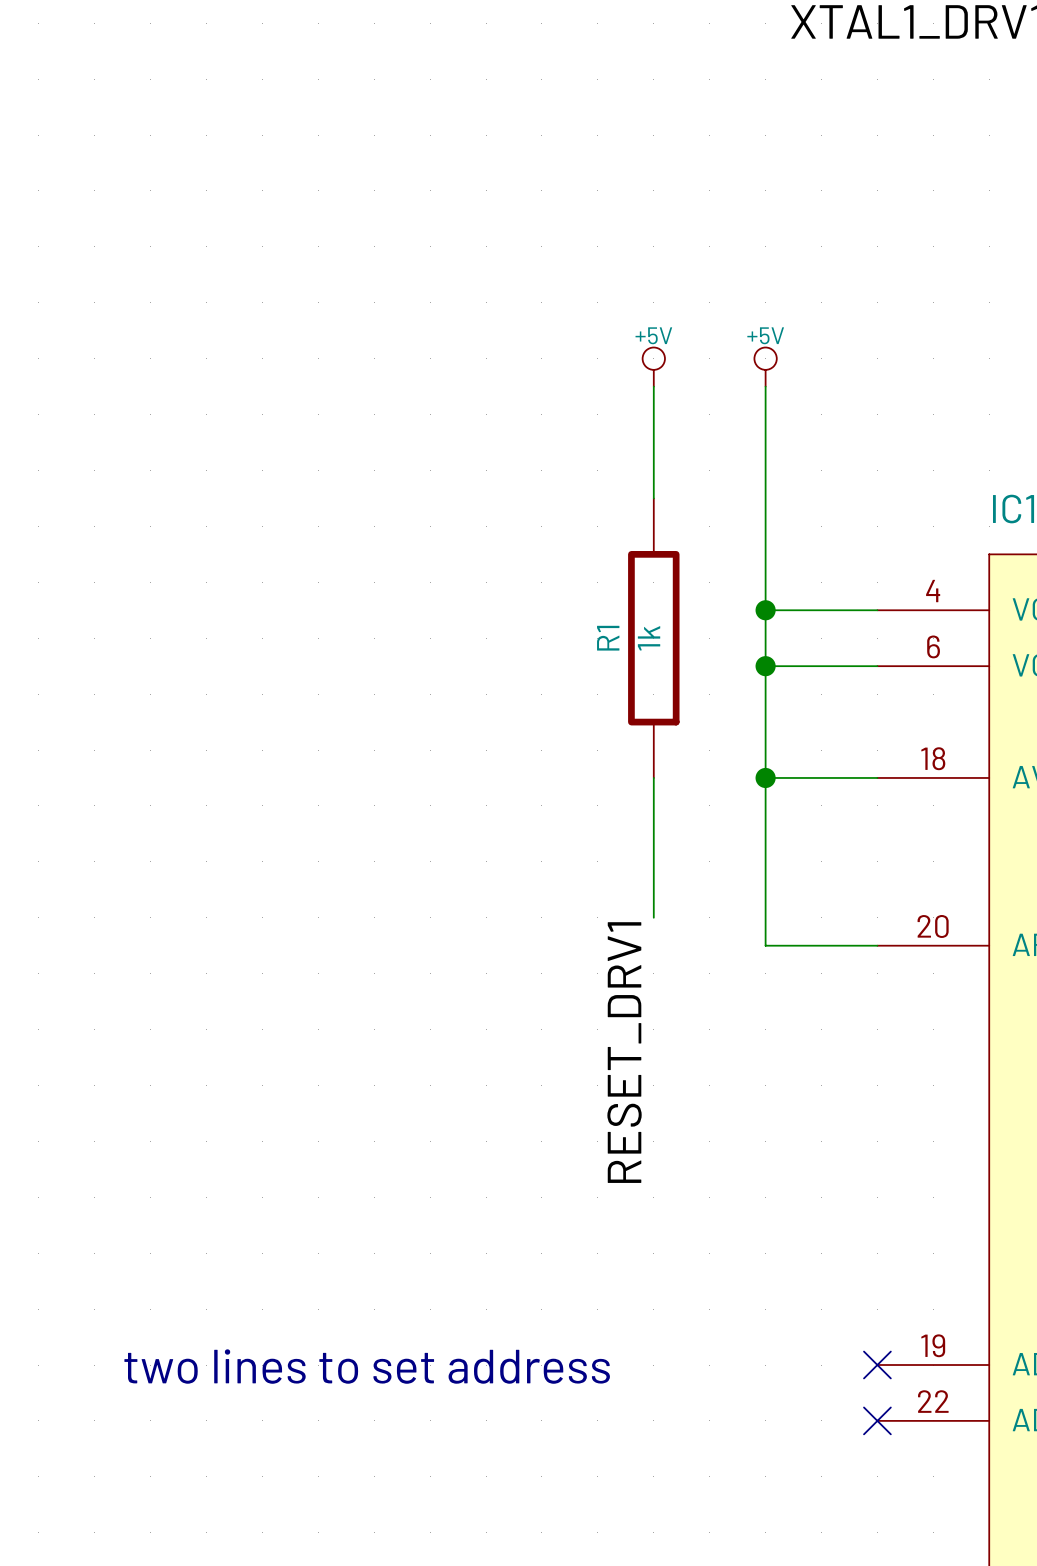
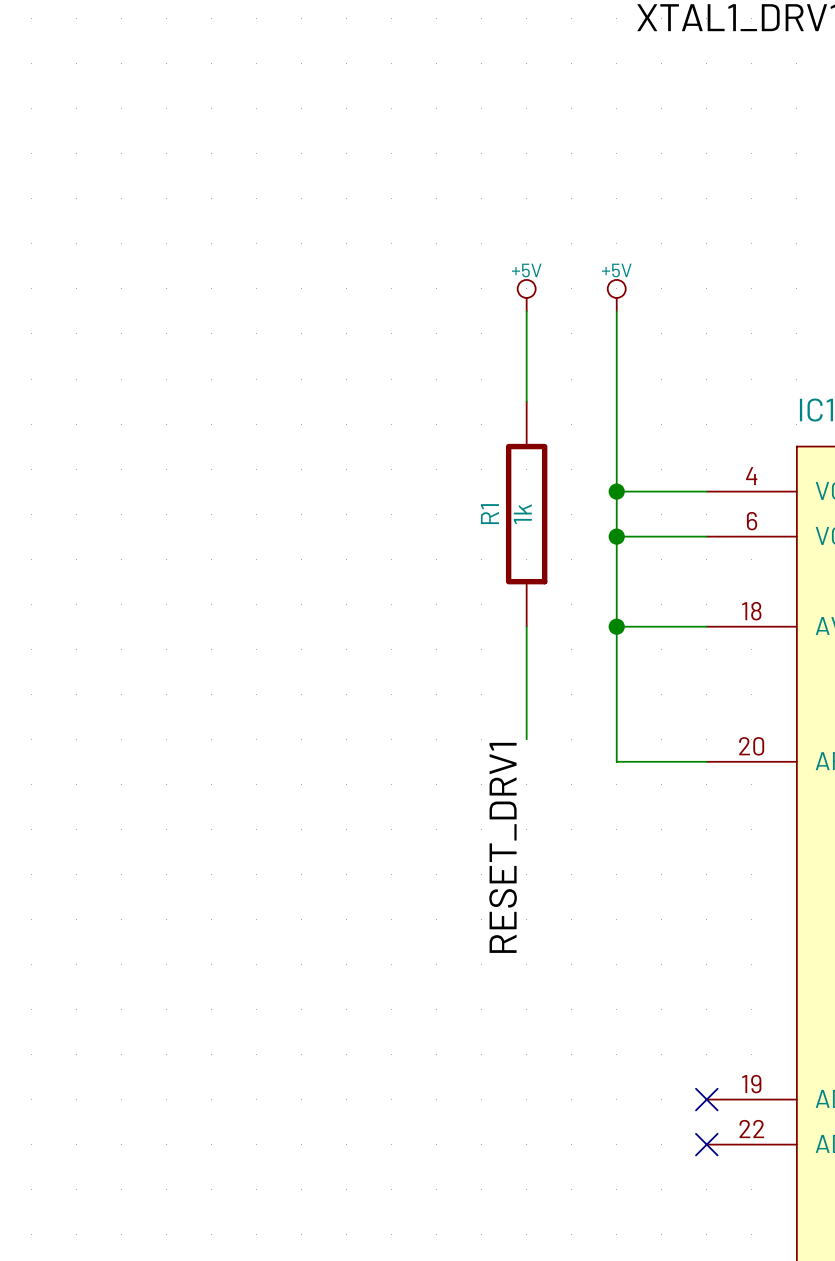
text: two lines to set address (367, 1366) -> none

